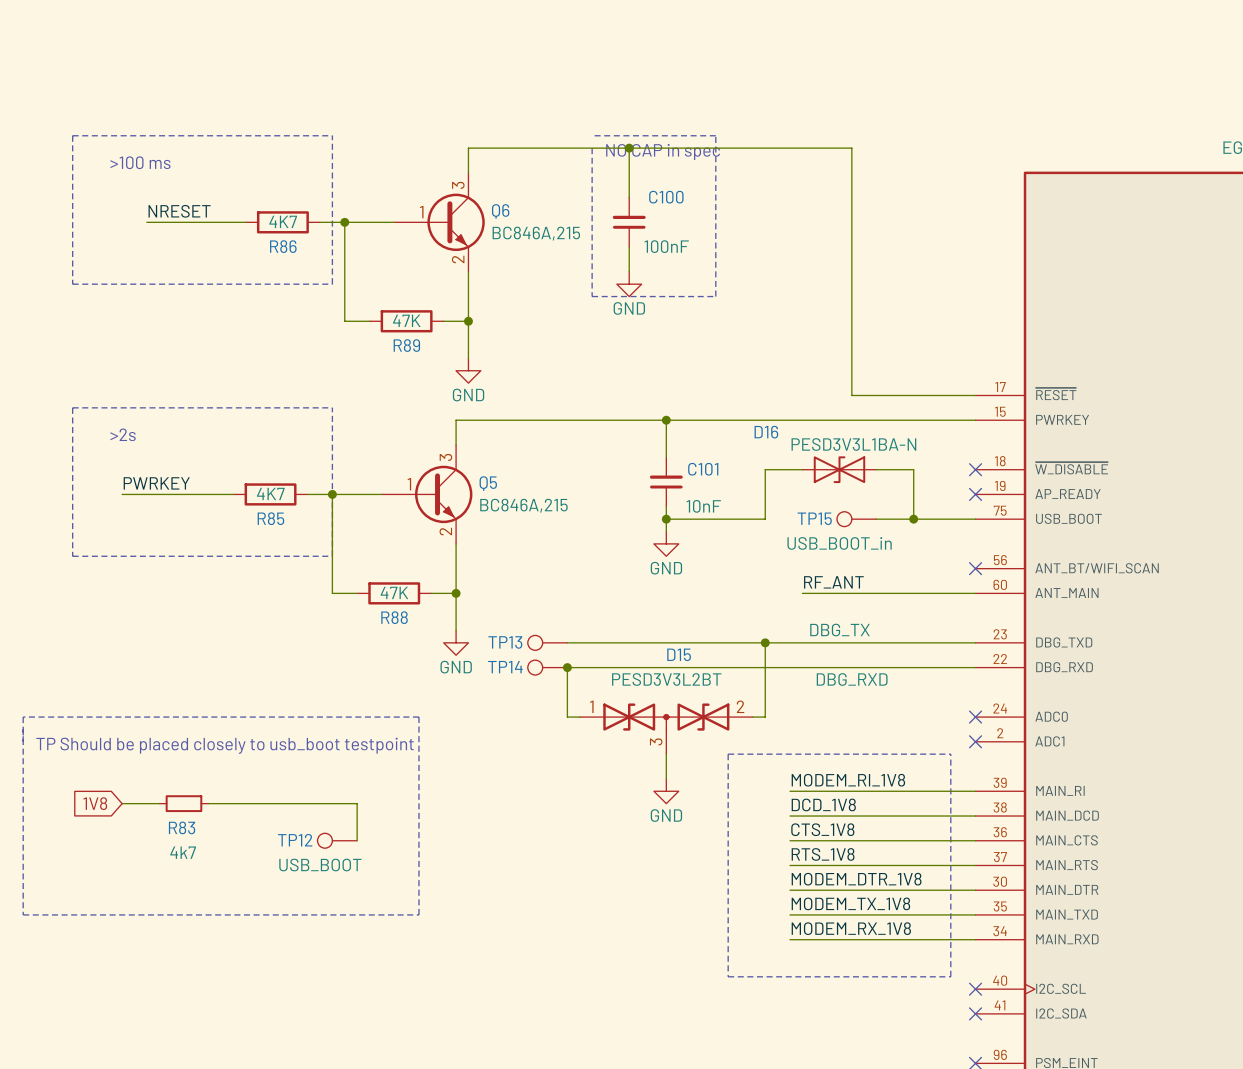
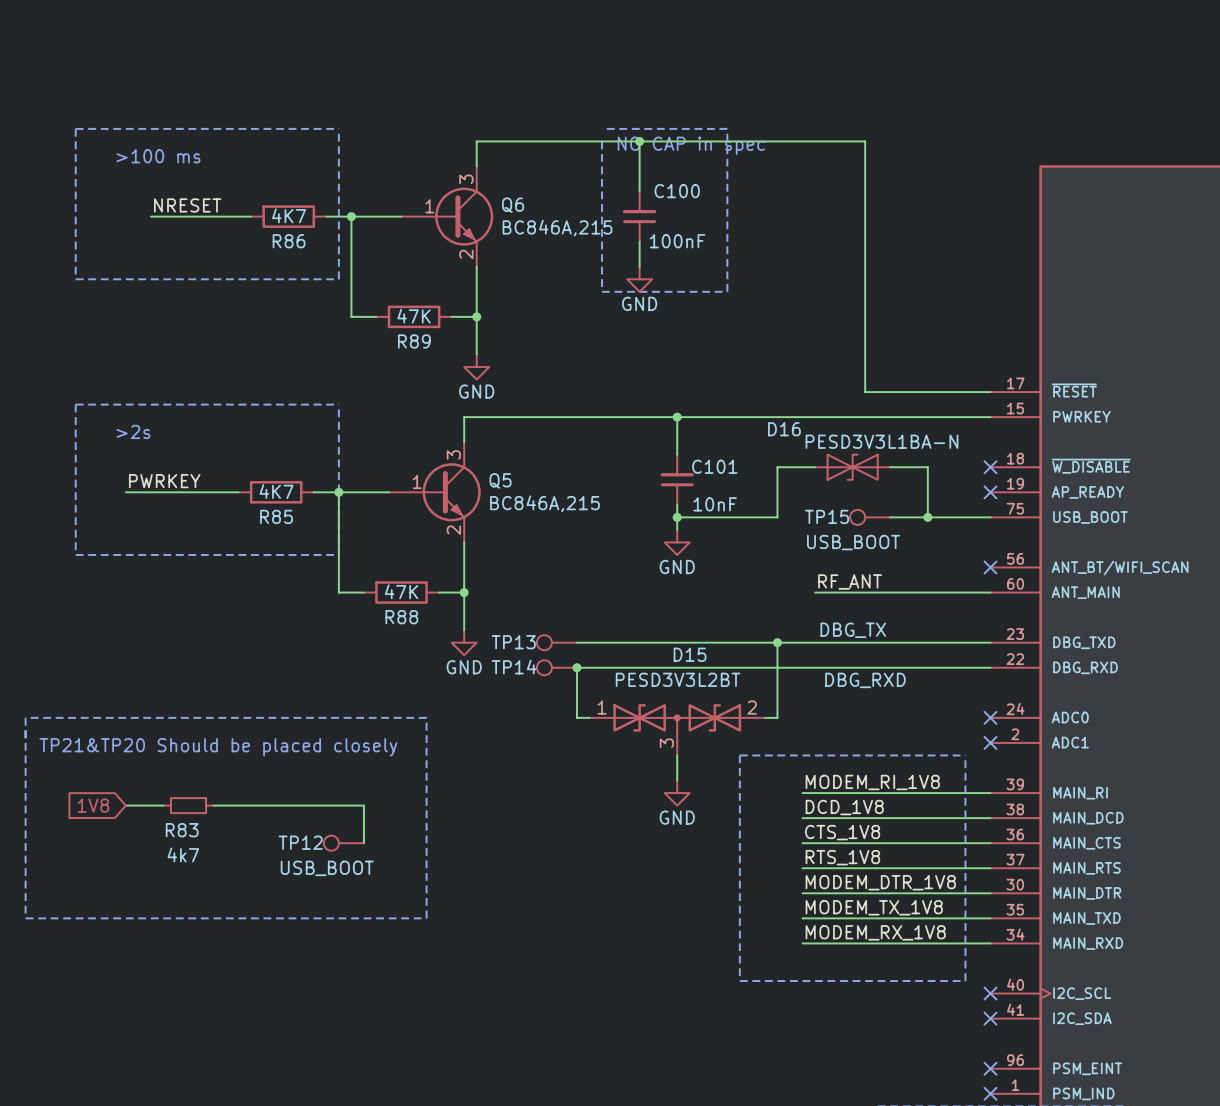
TP15 value: USB_BOOT_in (839, 543) -> USB_BOOT (853, 542)
text: TP Should be placed closely to usb_boot testpoint (225, 745) -> TP21&TP20 Should be placed closely (218, 747)

